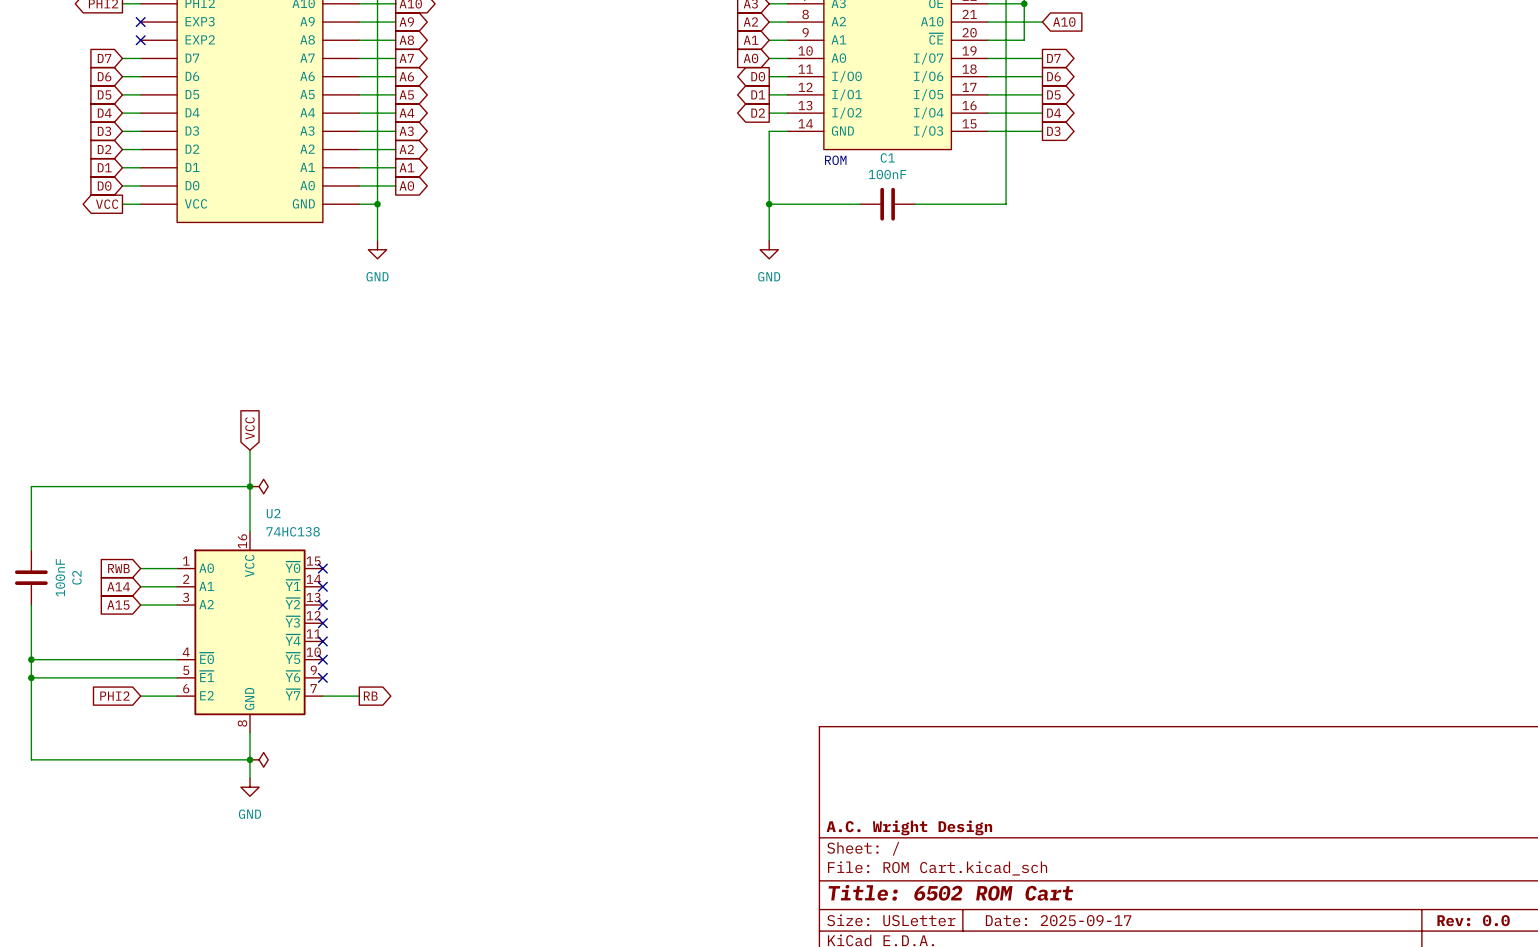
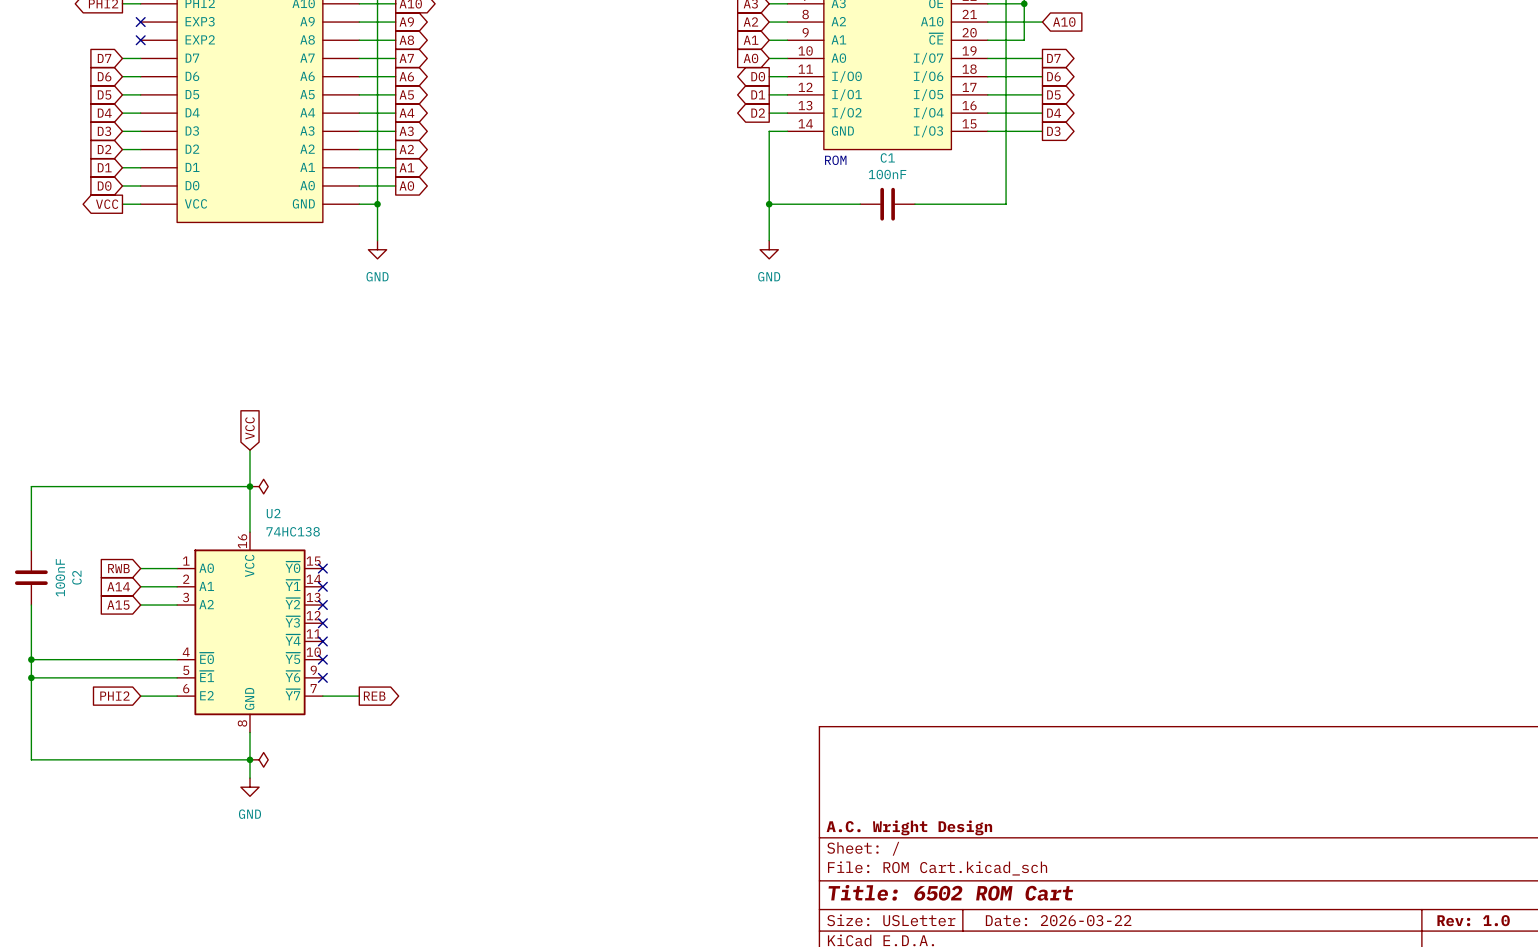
global label: RB (370, 696) -> REB (374, 696)
title block: Date: 2025-09-17 (1058, 920) -> Date: 2026-03-22 (1058, 920)
title block: Rev: 0.0 (1473, 920) -> Rev: 1.0 (1473, 920)

